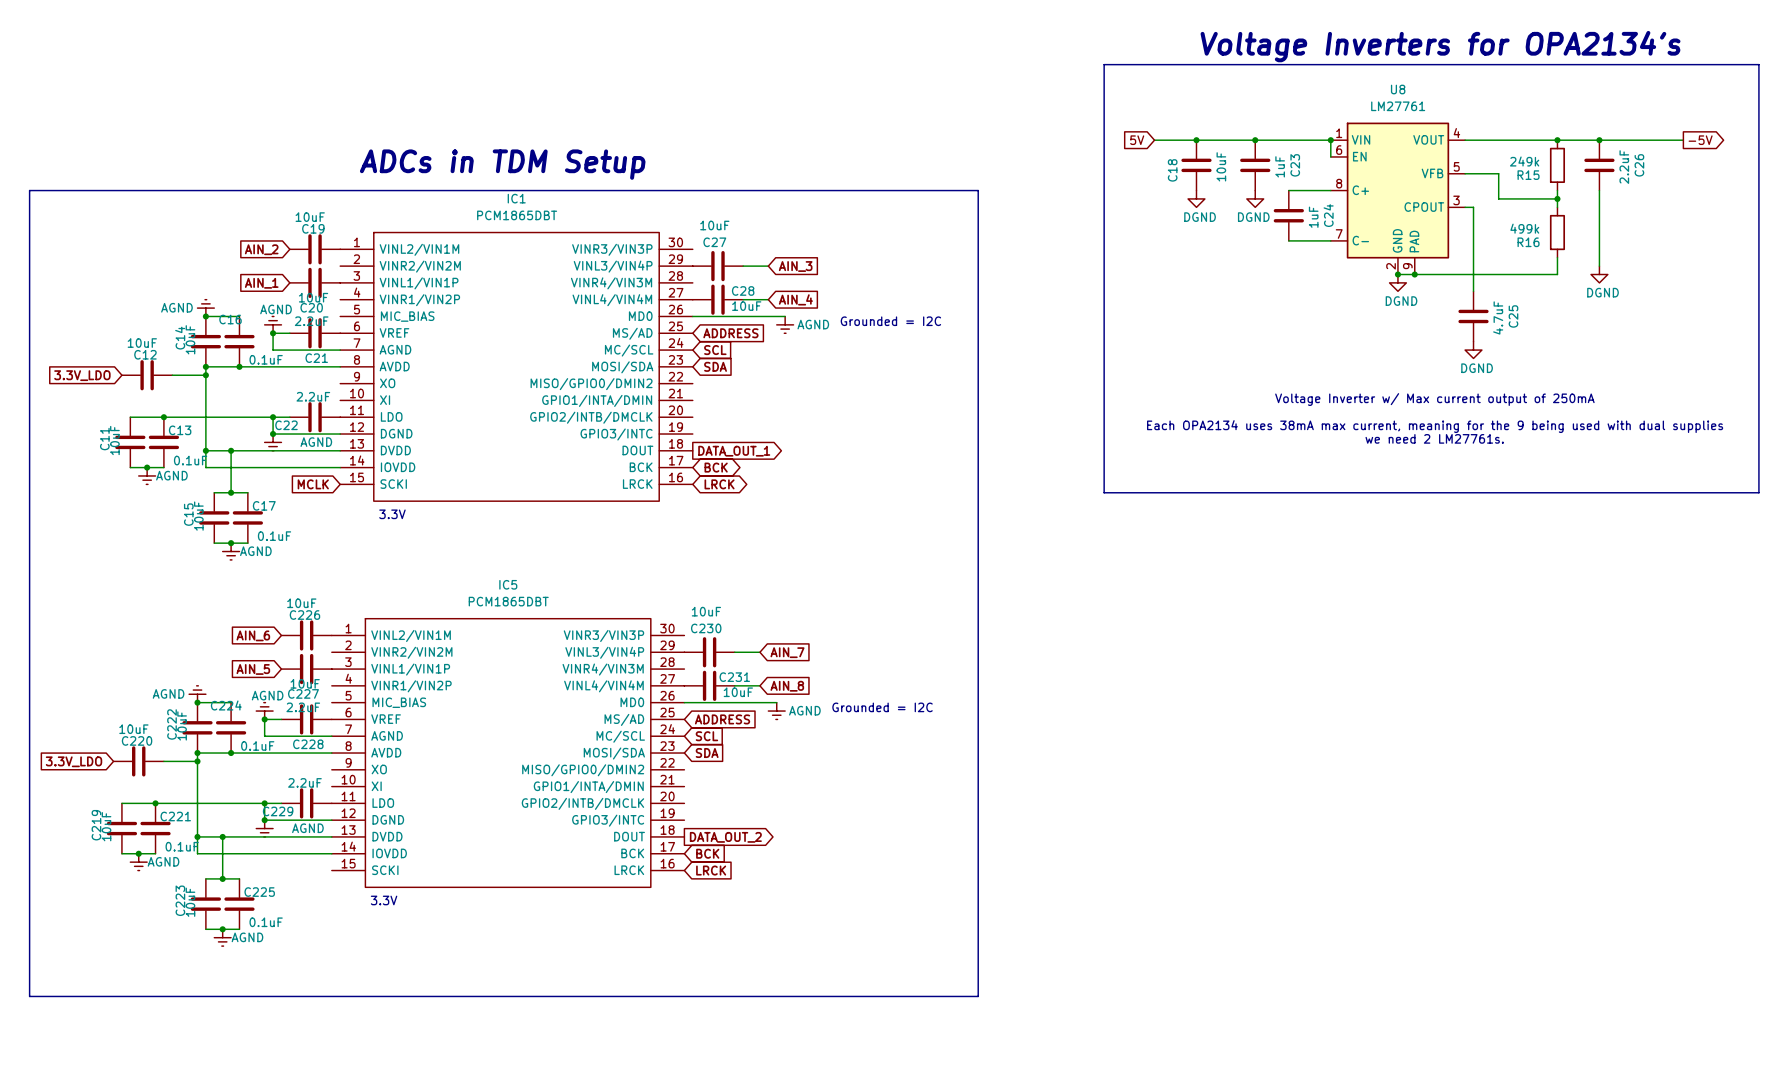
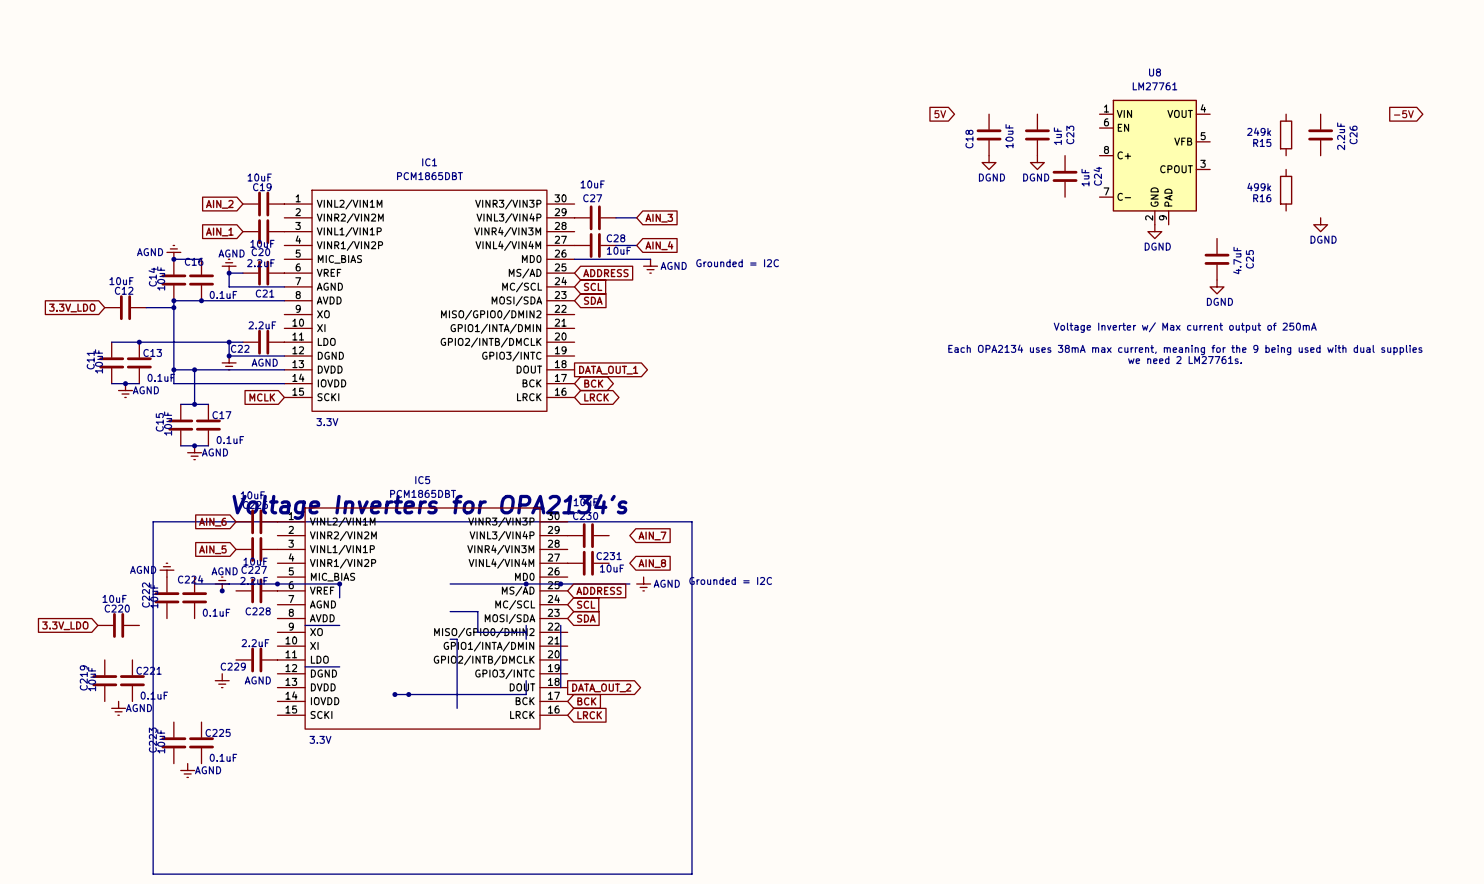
text: Voltage Inverters for OPA2134's (1440, 46) -> none
line: (1104, 64) (1758, 64) (1758, 492) (1104, 492) (1104, 64) -> none
wire: (1154, 140) (1330, 140) (1330, 156) -> none
junction: (1196, 140) -> none
junction: (1255, 140) -> none
junction: (1330, 140) -> none
wire: (1465, 140) (1683, 140) -> none
junction: (1557, 140) -> none
junction: (1599, 140) -> none
text: ADCs in TDM Setup (502, 164) -> none
wire: (1465, 173) (1498, 173) (1498, 198) (1557, 198) -> none
line: (29, 190) (978, 190) (978, 996) (29, 996) (29, 190) -> none
wire: (1288, 190) (1330, 190) -> none
wire: (1557, 190) (1557, 207) -> none
wire: (1599, 190) (1599, 266) -> none
junction: (1557, 198) -> none
wire: (1465, 207) (1473, 207) (1473, 291) -> none
wire: (1288, 240) (1330, 240) -> none
wire: (1557, 257) (1557, 274) (1397, 274) -> none
junction: (1397, 274) -> none
junction: (1414, 274) -> none
text: none -> Voltage Inverters for OPA2134's (429, 506)
line: none -> (153, 521) (691, 521) (691, 874) (153, 874) (153, 521)
wire: (734, 652) (759, 652) -> none
wire: (734, 685) (759, 685) -> none
wire: (197, 702) (231, 702) -> none
junction: (197, 702) -> none
wire: (684, 702) (776, 702) -> none
wire: none -> (194, 583) (339, 583) (339, 597)
junction: none -> (277, 583)
junction: none -> (339, 583)
wire: none -> (450, 583) (629, 583)
junction: none -> (526, 583)
junction: none -> (560, 583)
wire: (281, 719) (264, 719) (264, 736) (331, 736) -> none
wire: none -> (450, 611) (477, 611) (477, 632) (526, 632)
junction: (197, 753) -> none
junction: (231, 753) -> none
wire: (331, 753) (197, 753) (197, 853) (331, 853) -> none
wire: (163, 761) (197, 761) -> none
junction: (197, 761) -> none
wire: none -> (305, 625) (339, 625)
wire: none -> (526, 625) (526, 639)
wire: none -> (560, 625) (560, 687)
wire: none -> (450, 639) (457, 639) (457, 708)
wire: (121, 803) (281, 803) -> none
junction: (155, 803) -> none
wire: (264, 803) (264, 820) (331, 820) -> none
junction: (264, 803) -> none
wire: none -> (305, 666) (339, 666)
junction: (264, 820) -> none
wire: none -> (526, 680) (526, 694) (394, 694)
wire: (197, 836) (331, 836) -> none
junction: (197, 836) -> none
wire: (222, 836) (222, 878) -> none
junction: (222, 836) -> none
junction: none -> (394, 694)
junction: none -> (408, 694)
wire: (121, 853) (155, 853) -> none
junction: (138, 853) -> none
wire: (205, 878) (239, 878) -> none
junction: (222, 878) -> none
wire: (205, 929) (239, 929) -> none
junction: (222, 929) -> none

